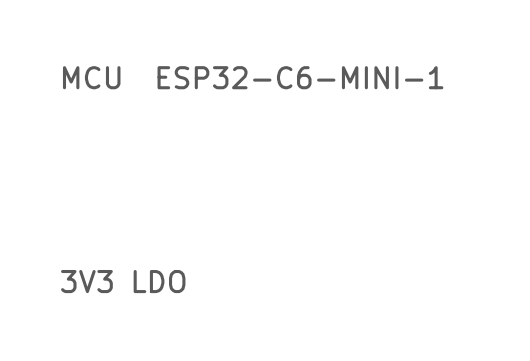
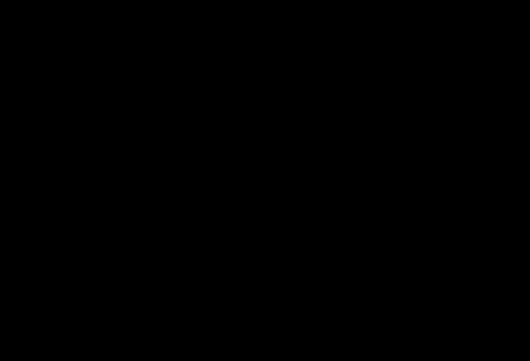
text: MCU ESP32-C6-MINI-1 (253, 77) -> none
text: 3V3 LDO (123, 281) -> none

